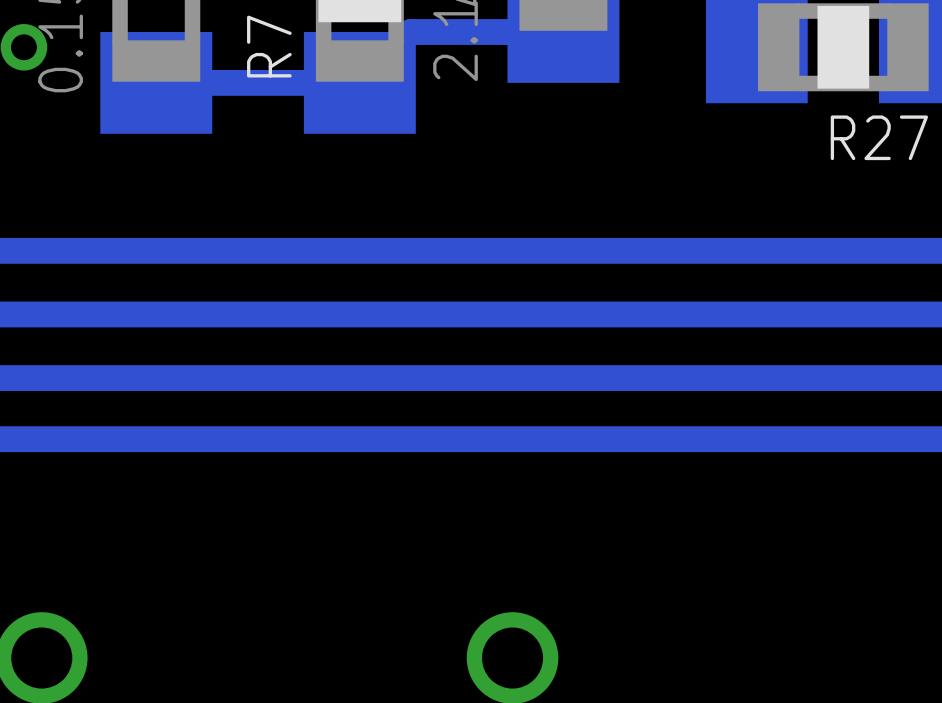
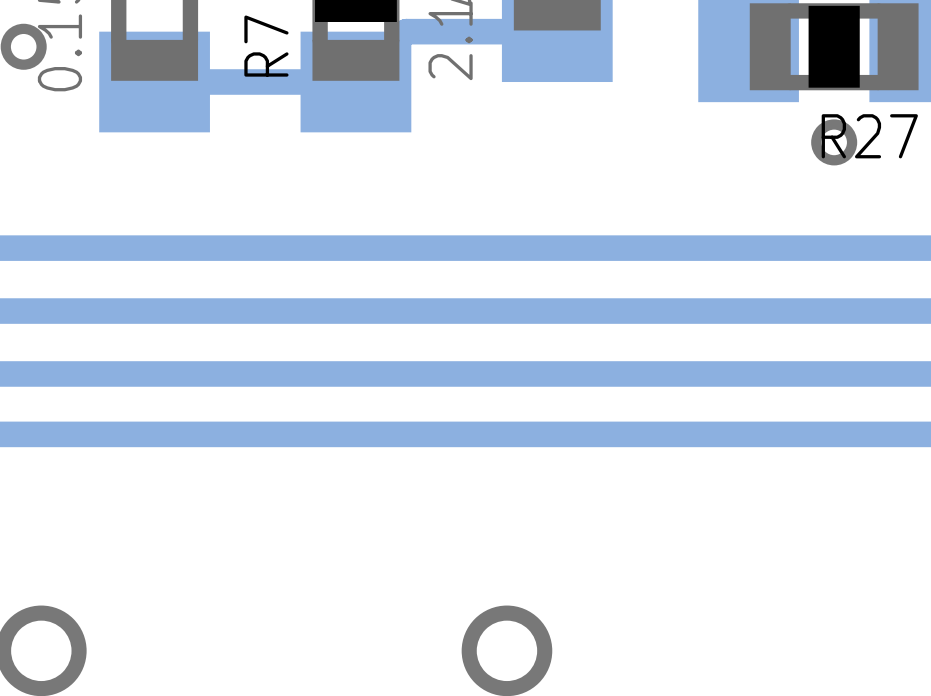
via: none -> (834, 142)

